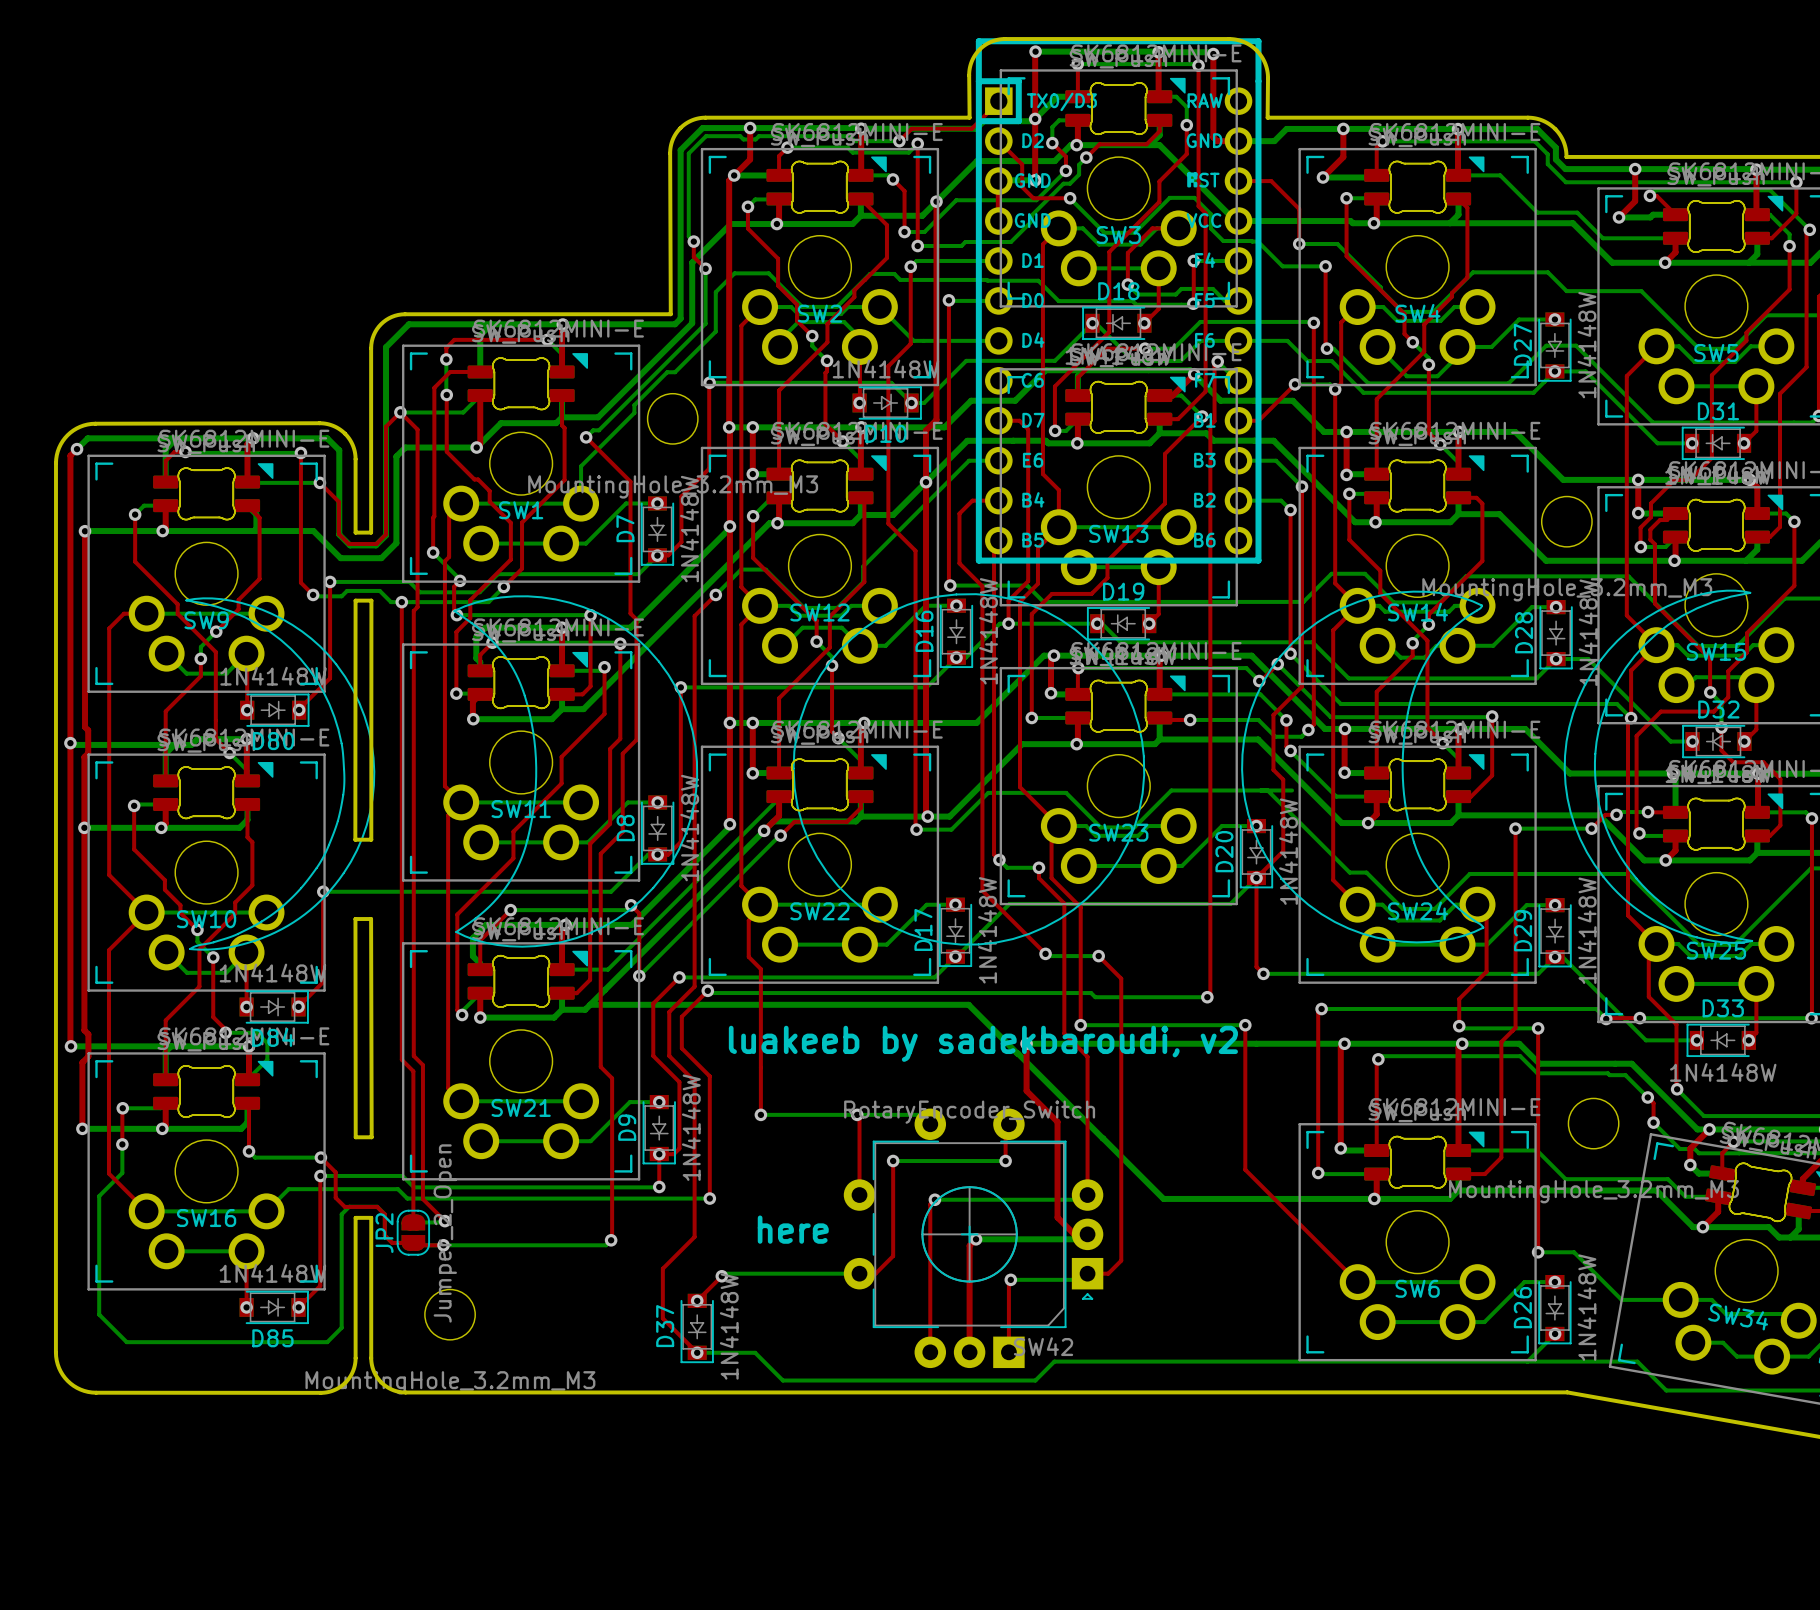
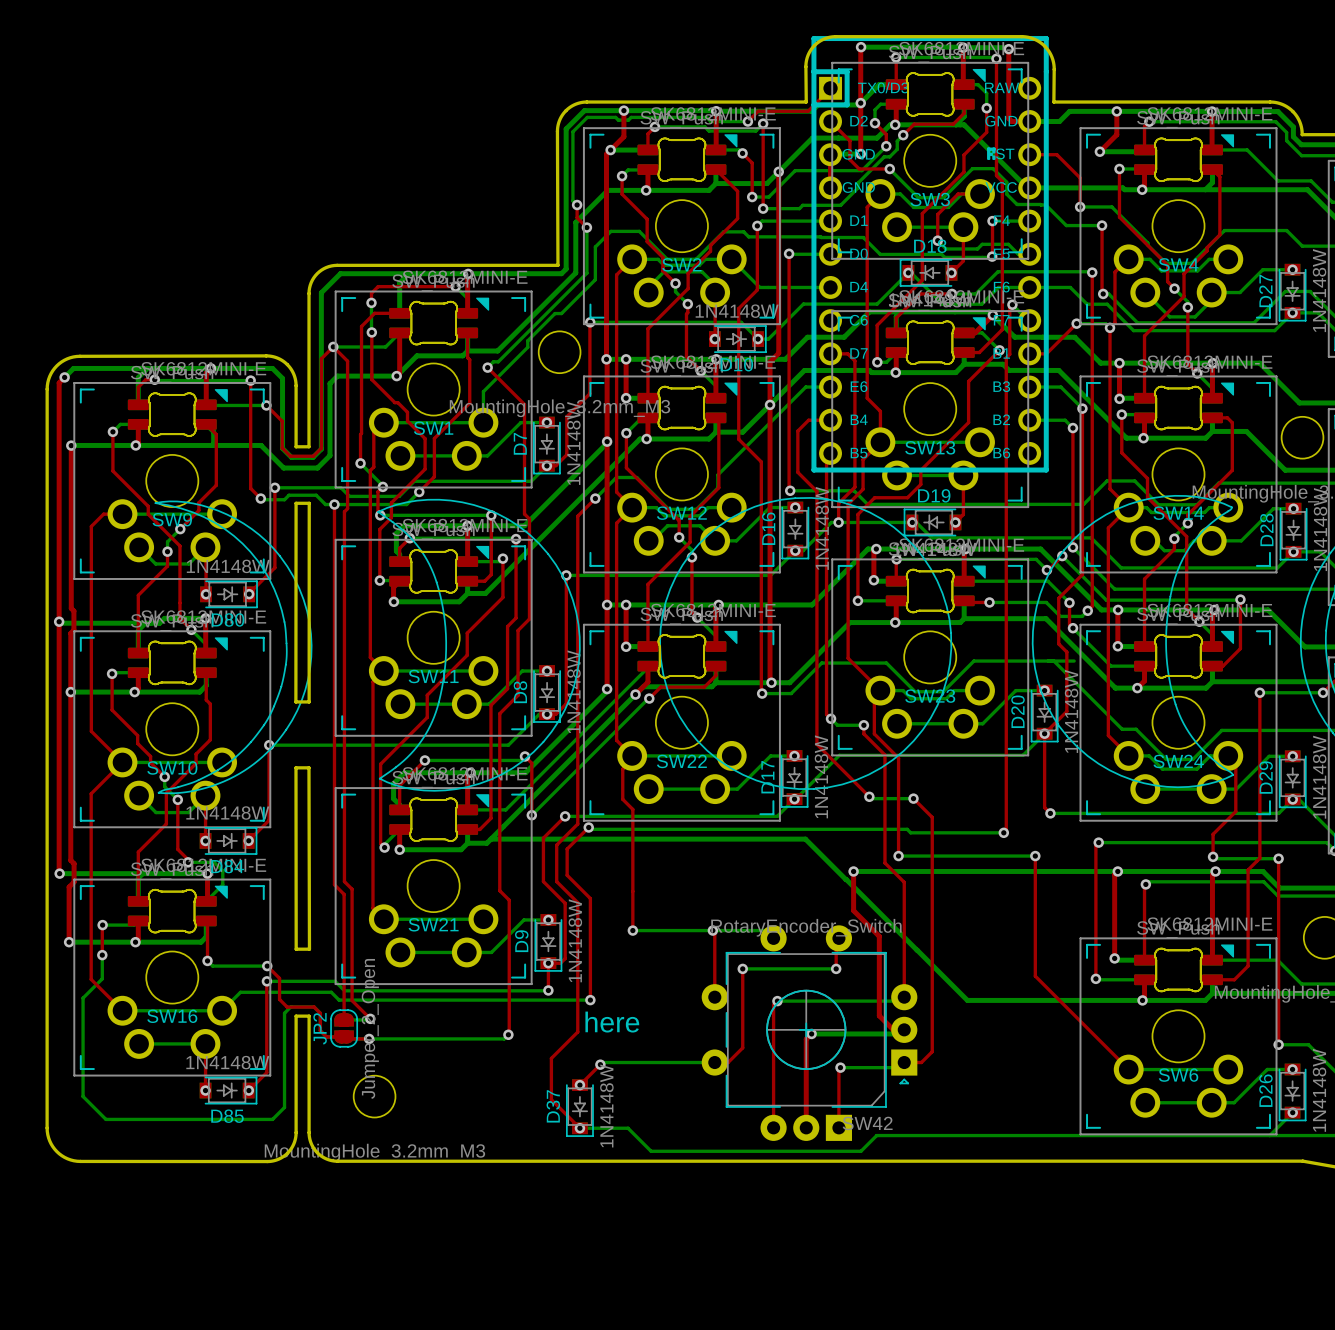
text: luakeeb by sadekbaroudi, v2 (983, 1043) -> none
text position: here (793, 1229) -> here (612, 1022)

